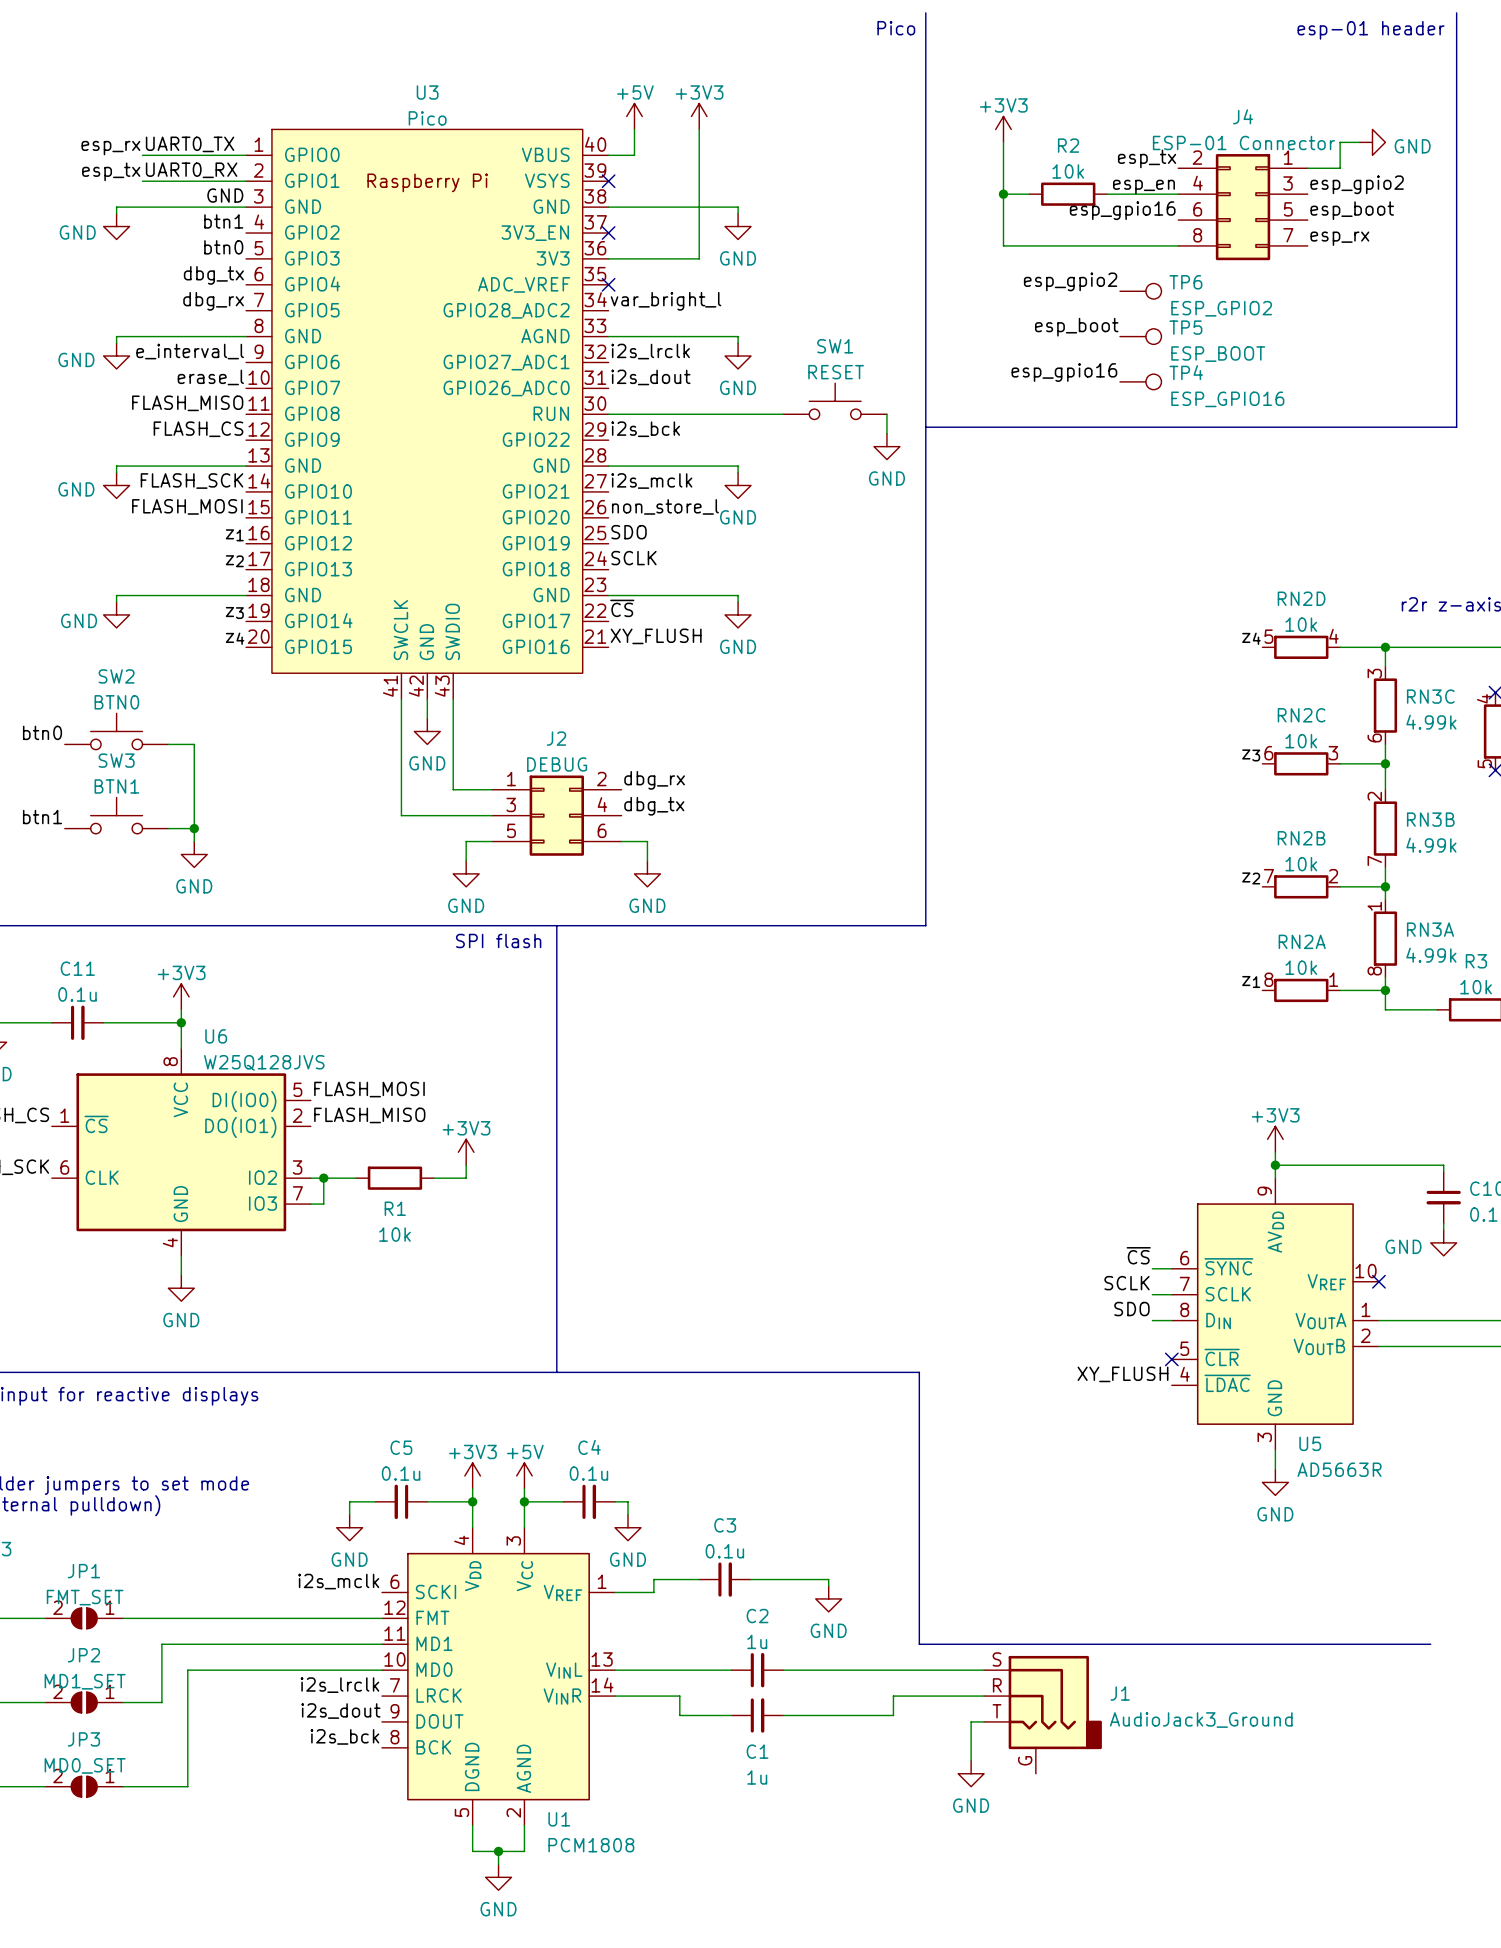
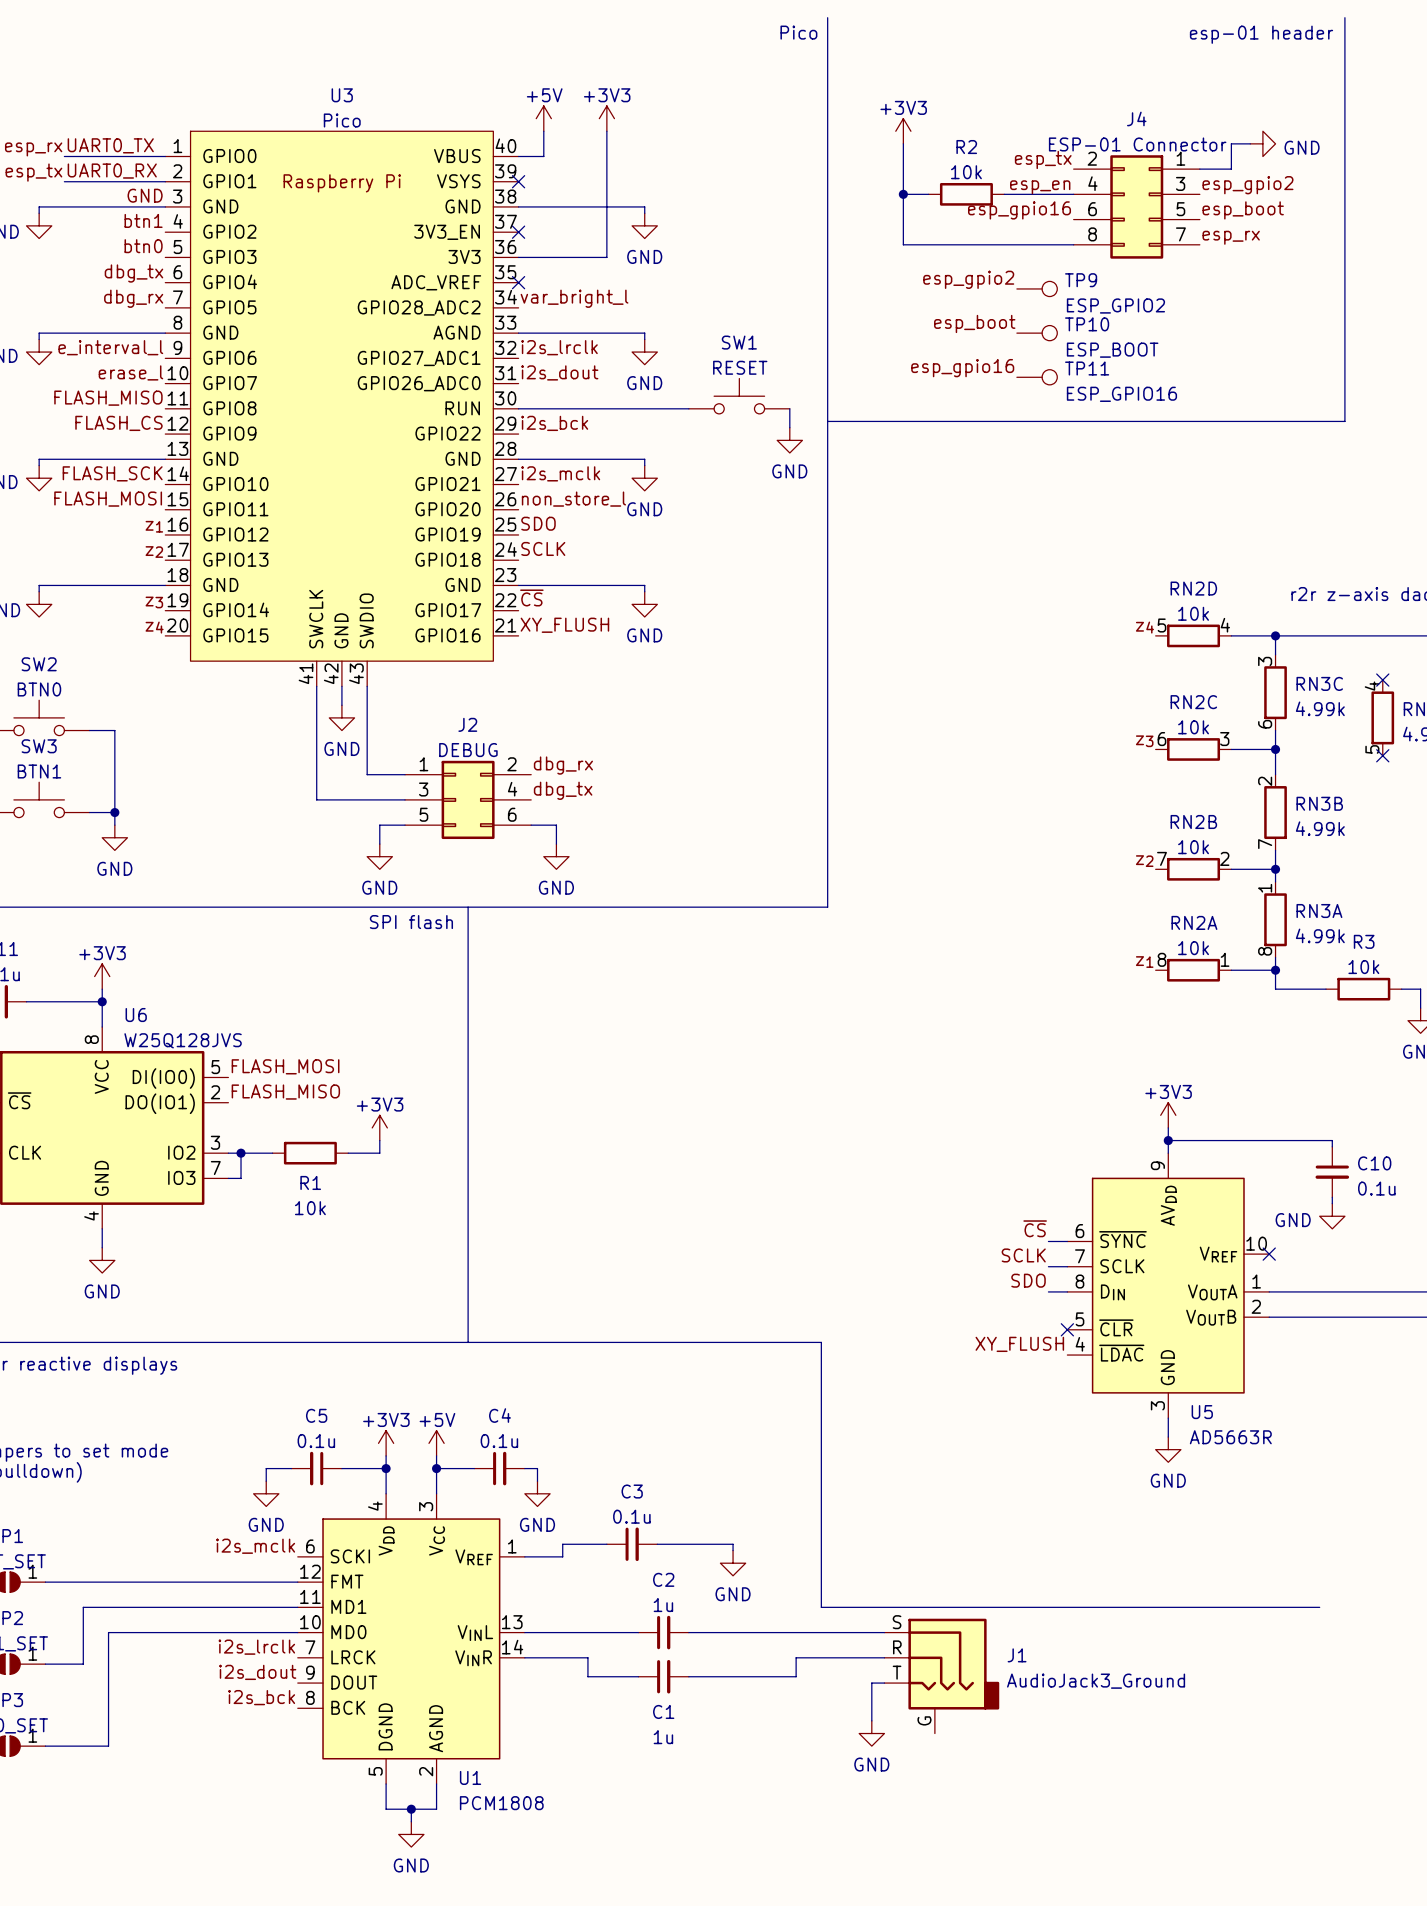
TP6 name: TP6 (1185, 282) -> TP9 (1081, 280)
TP5 name: TP5 (1185, 327) -> TP10 (1087, 324)
TP4 name: TP4 (1186, 372) -> TP11 (1087, 368)

